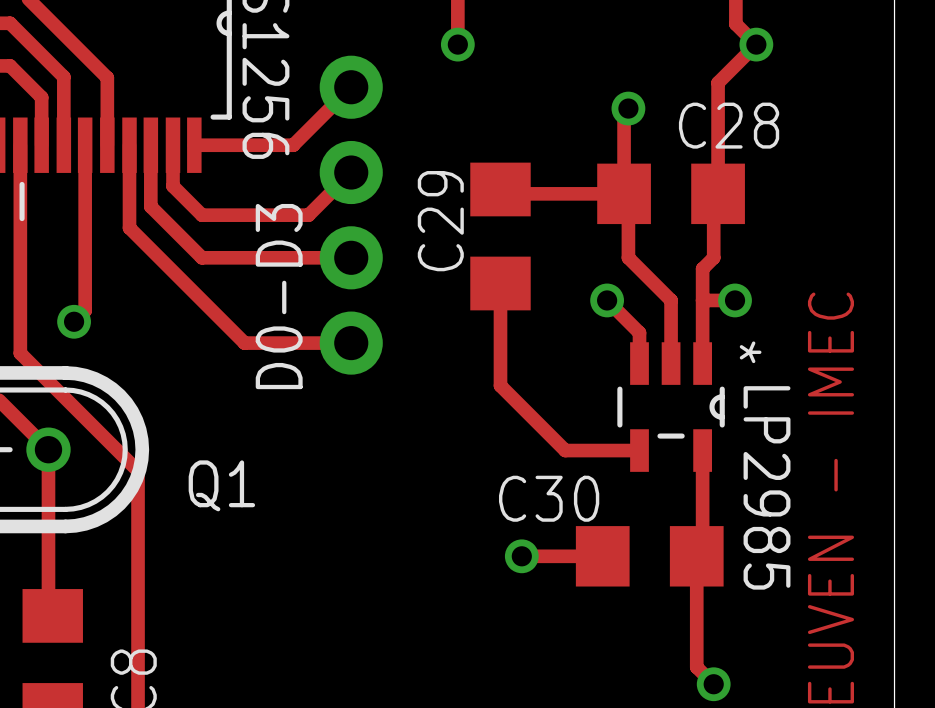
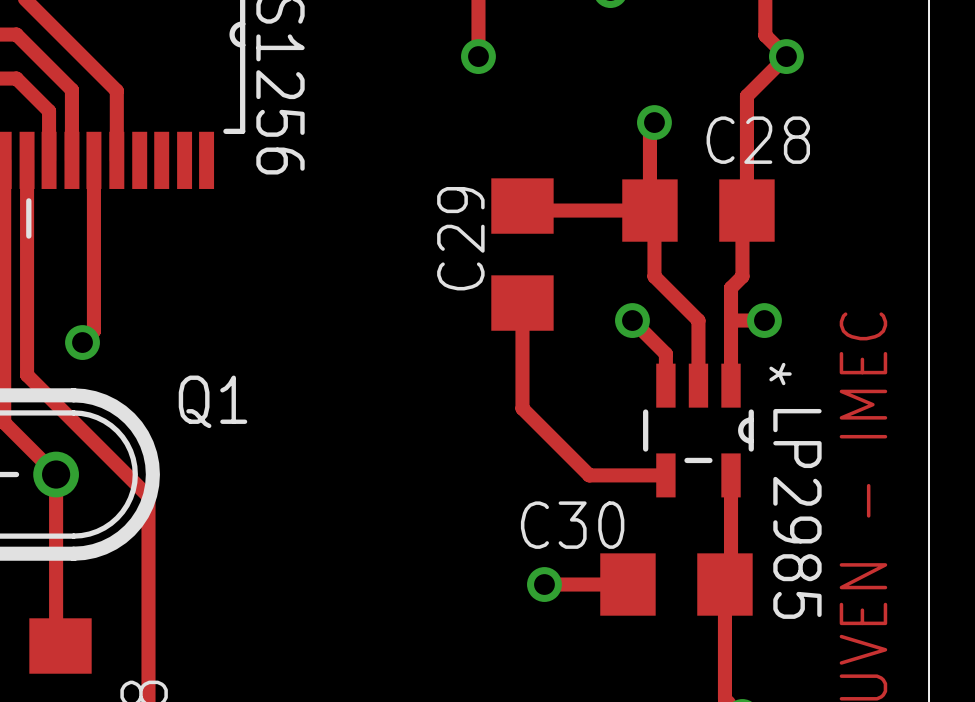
track: (351, 87) (293, 145) (194, 145) -> none
track: (129, 145) (129, 227) (244, 343) (351, 343) -> none
track: (150, 145) (150, 206) (202, 257) (351, 257) -> none
track: (173, 145) (173, 186) (202, 215) (308, 215) (351, 172) -> none
D0-D3: (351, 215) -> none
Q1 name position: Q1 (221, 485) -> Q1 (212, 401)

